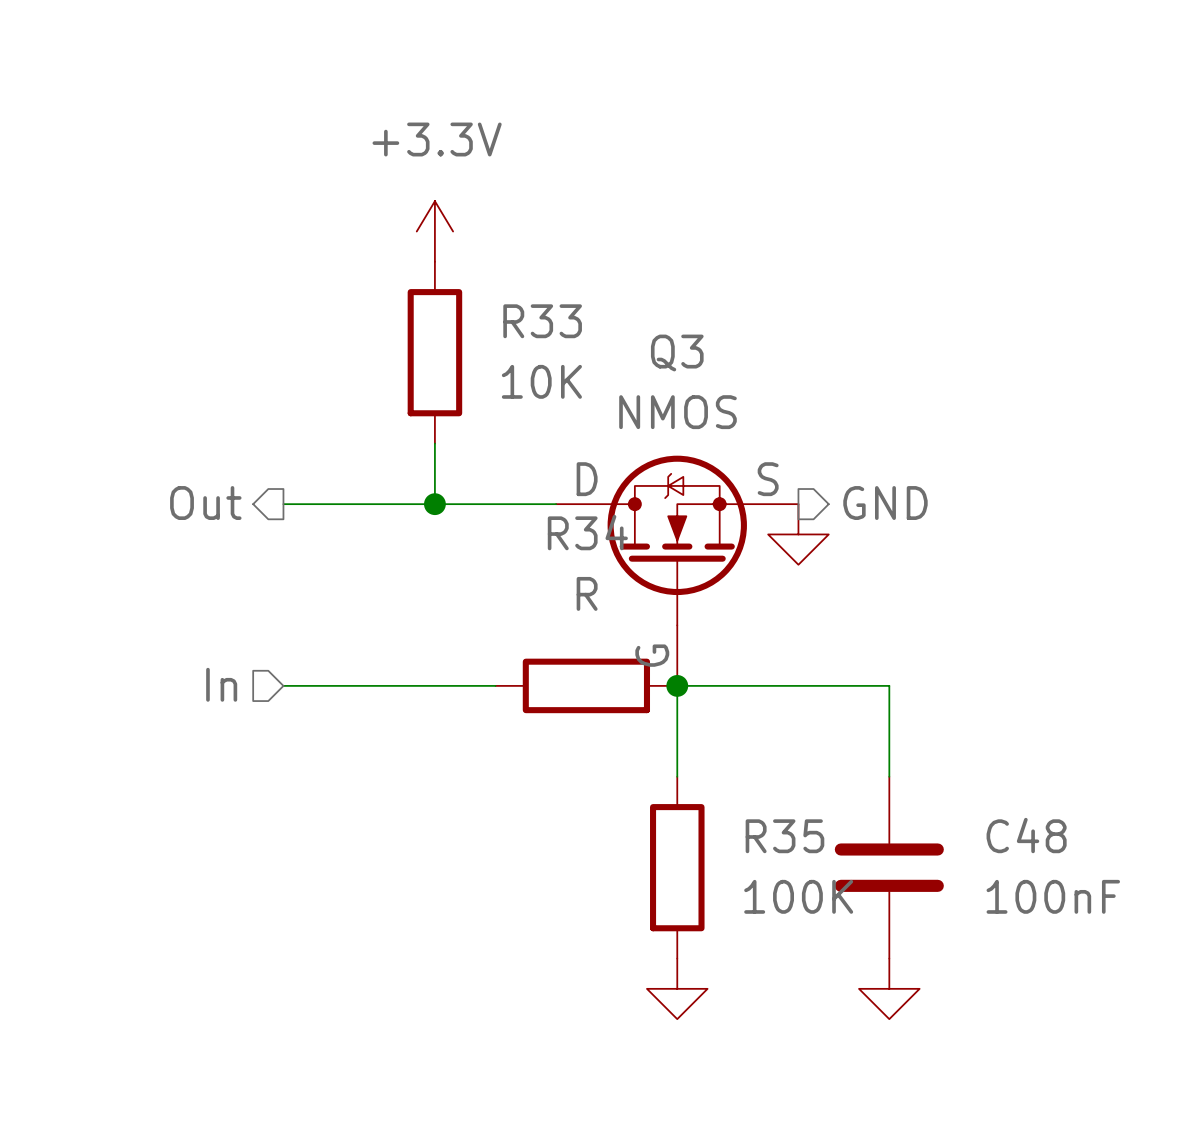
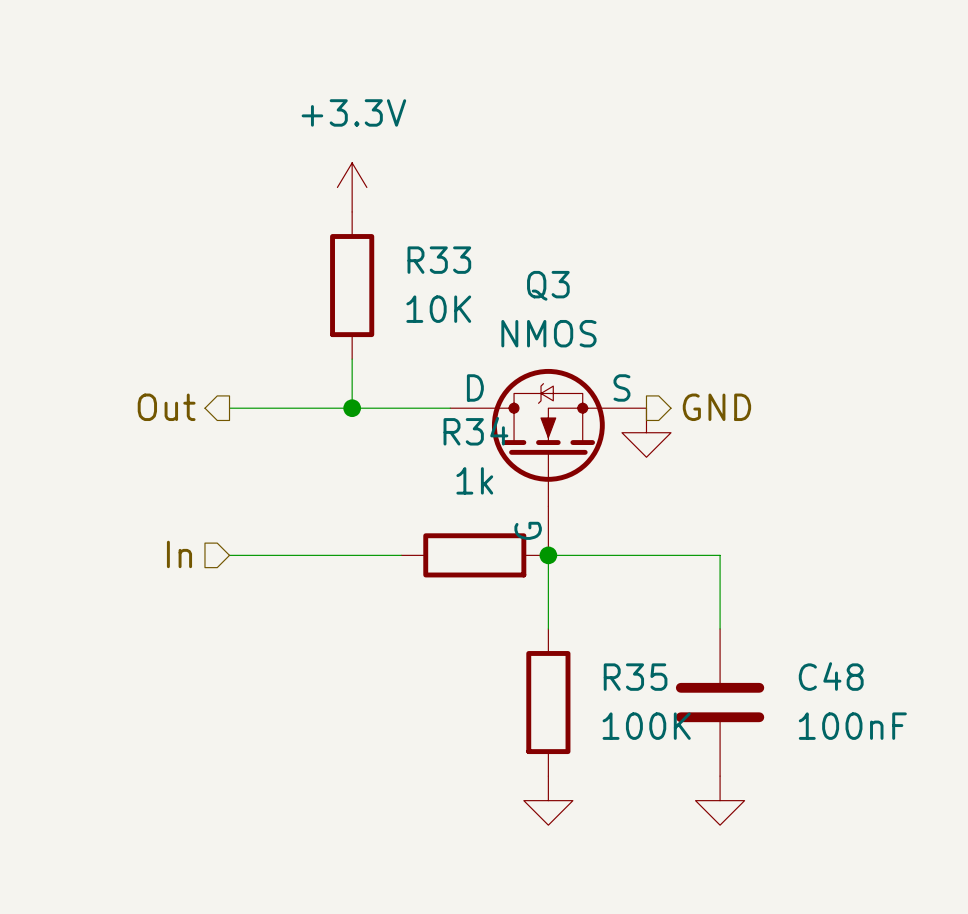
R34 value: R (587, 593) -> 1k (474, 480)

